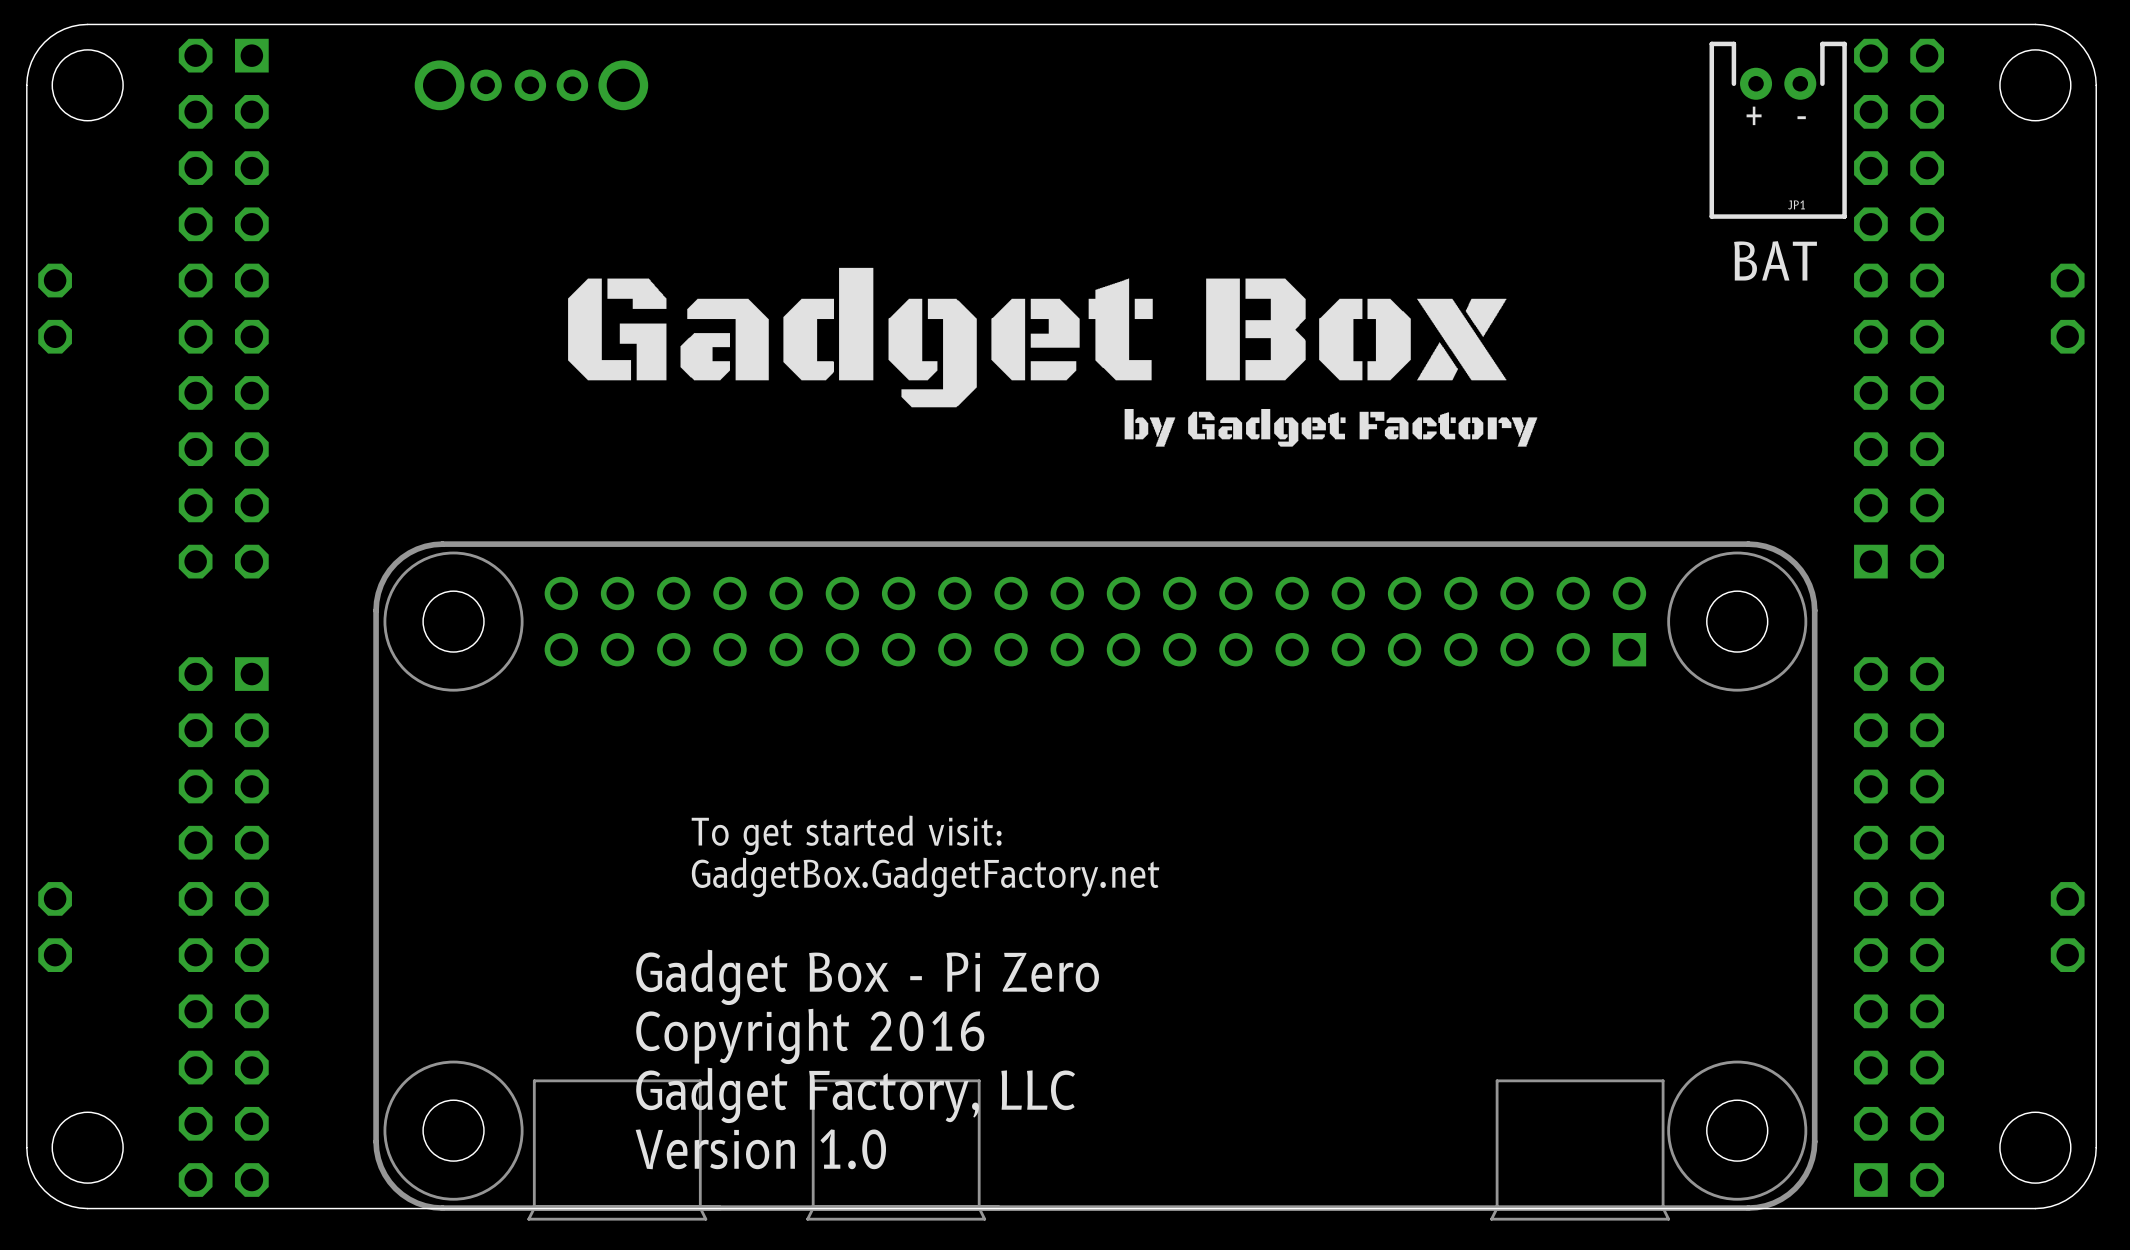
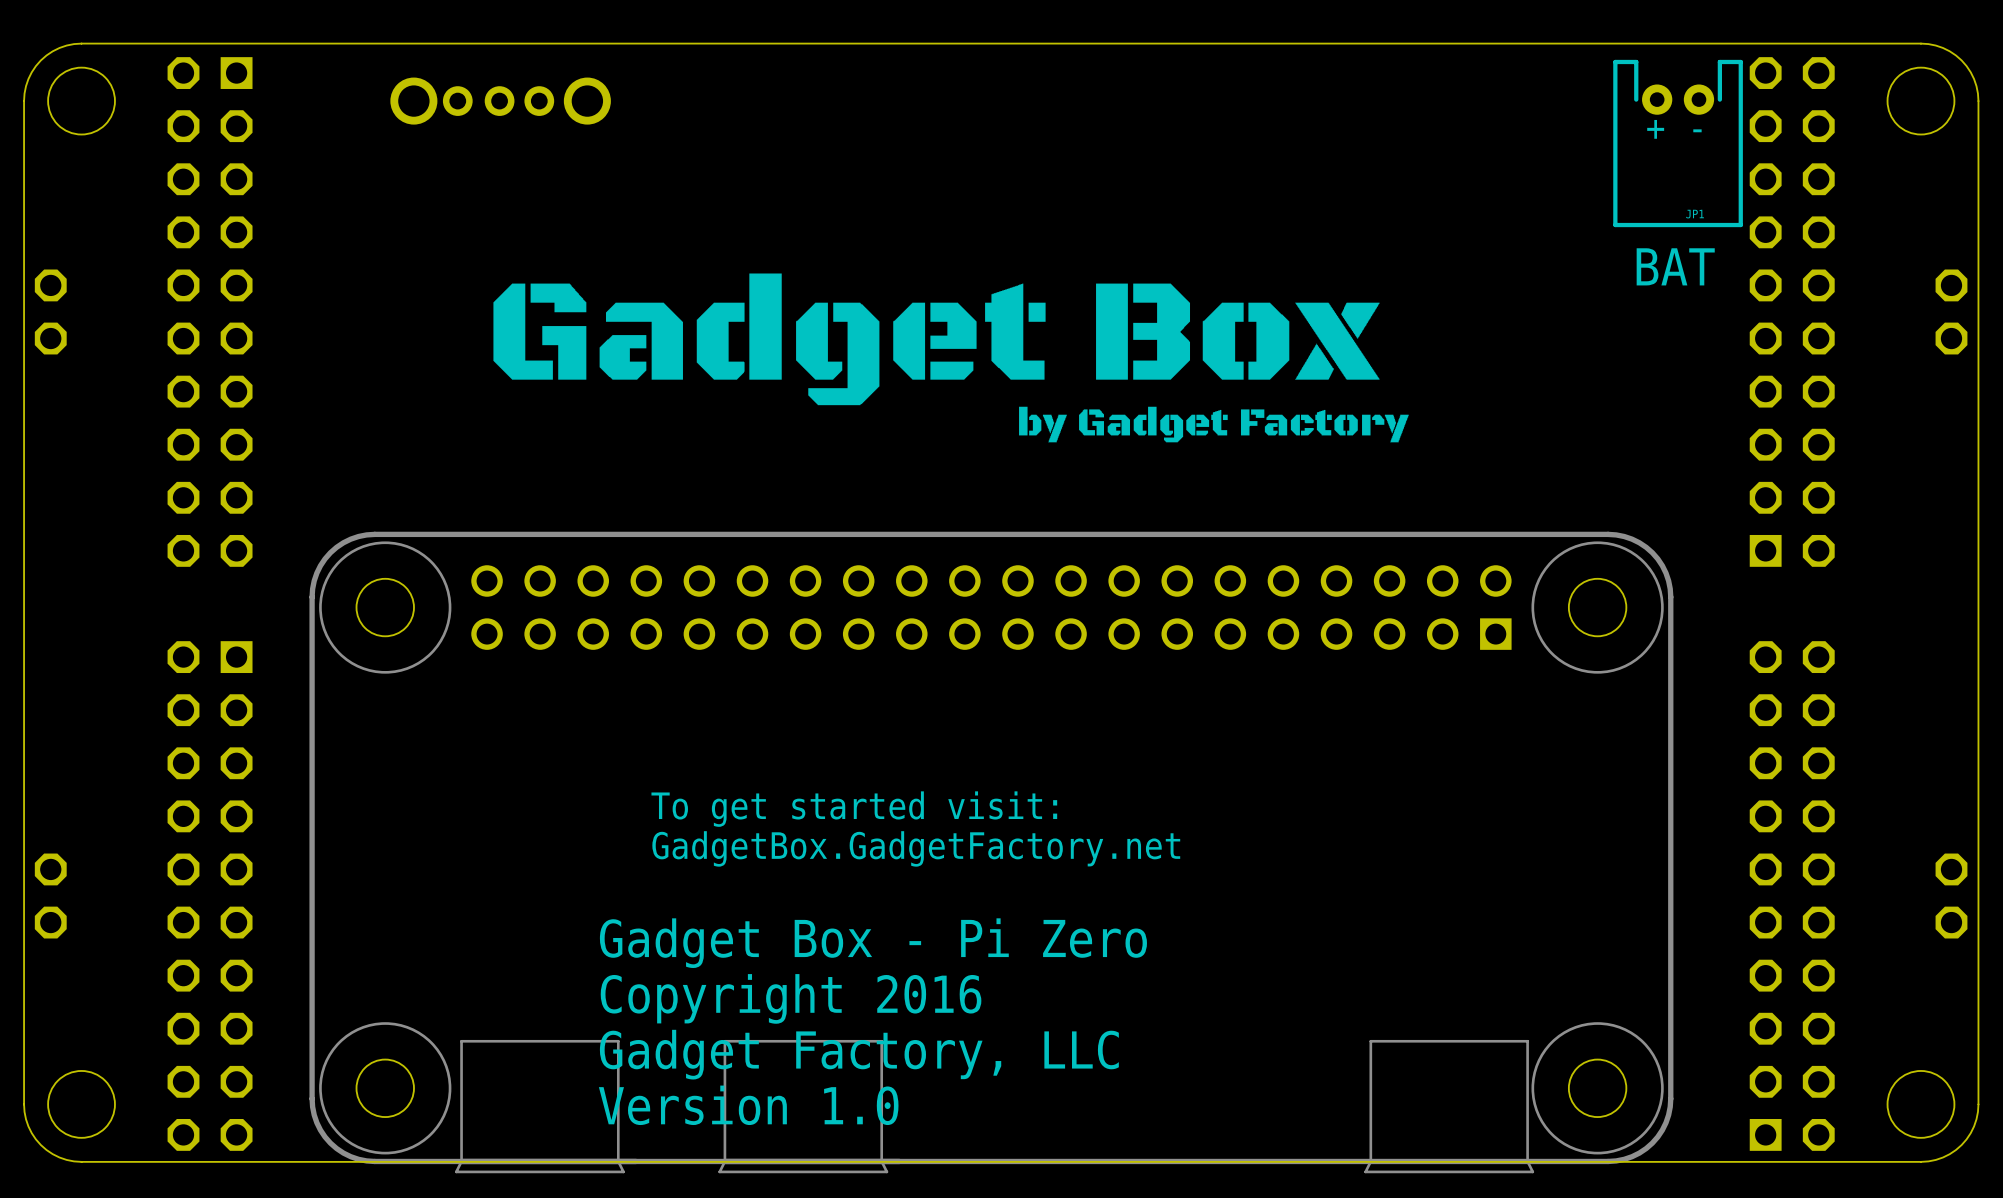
drawing position: (1052, 357) -> (951, 357)
part position: (1095, 880) -> (991, 852)

